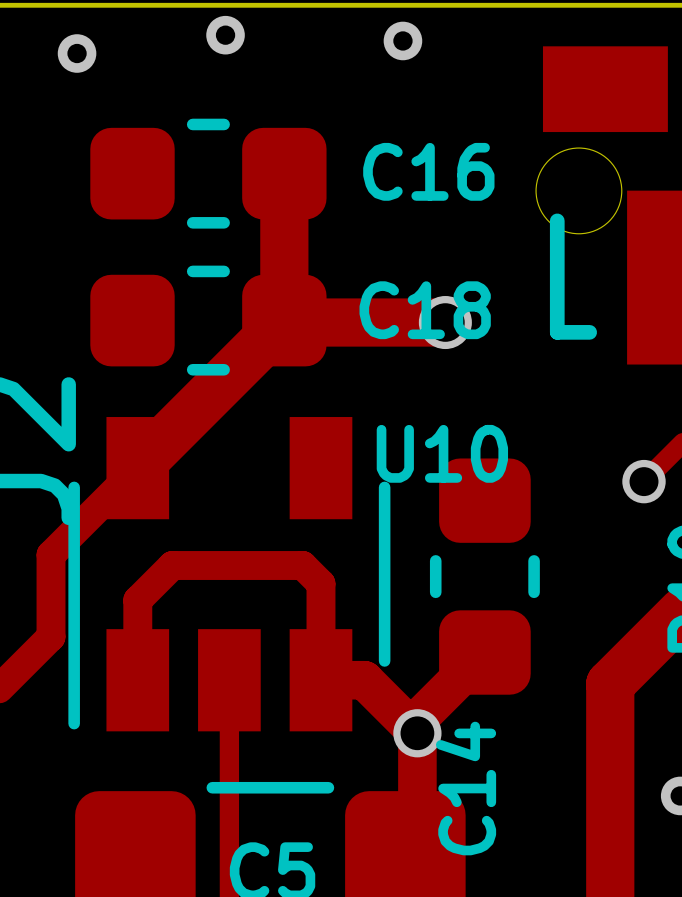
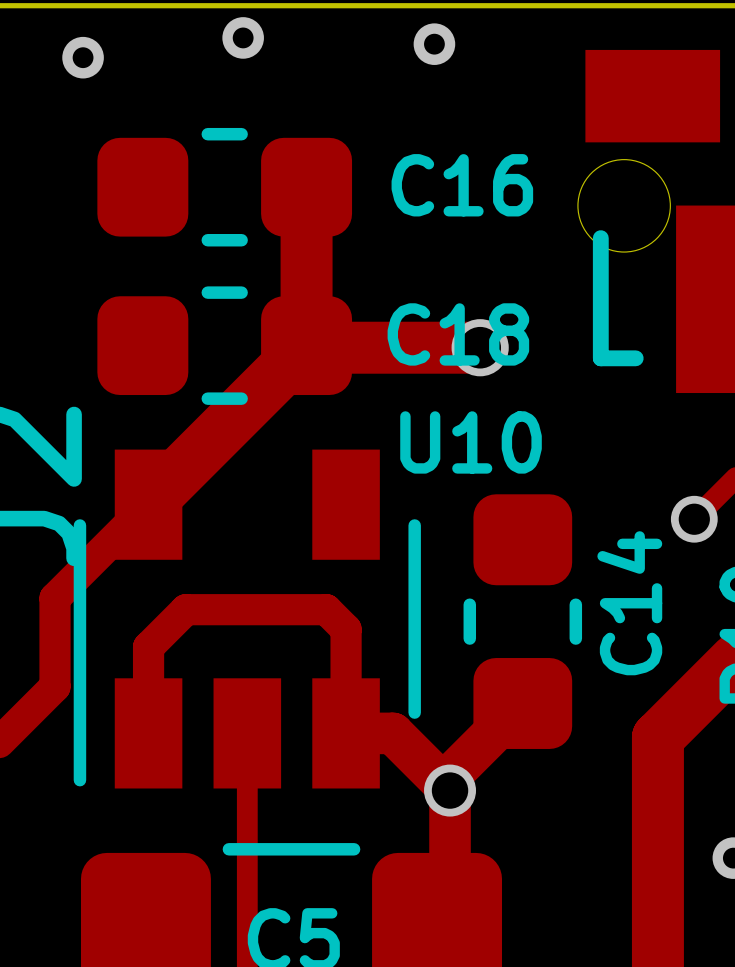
U10 name position: U10 (442, 453) -> U10 (471, 442)
C14 name position: C14 (466, 788) -> C14 (629, 603)

